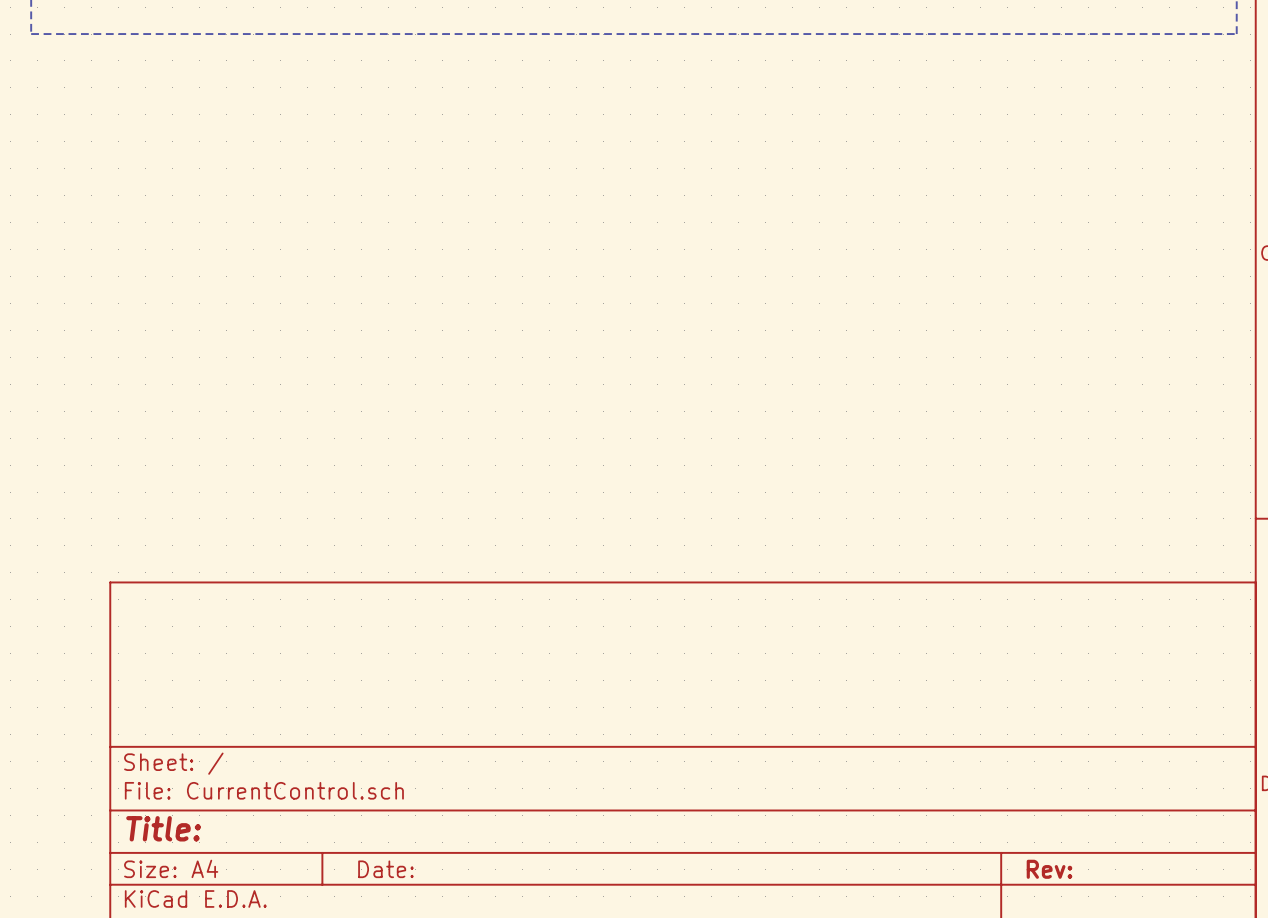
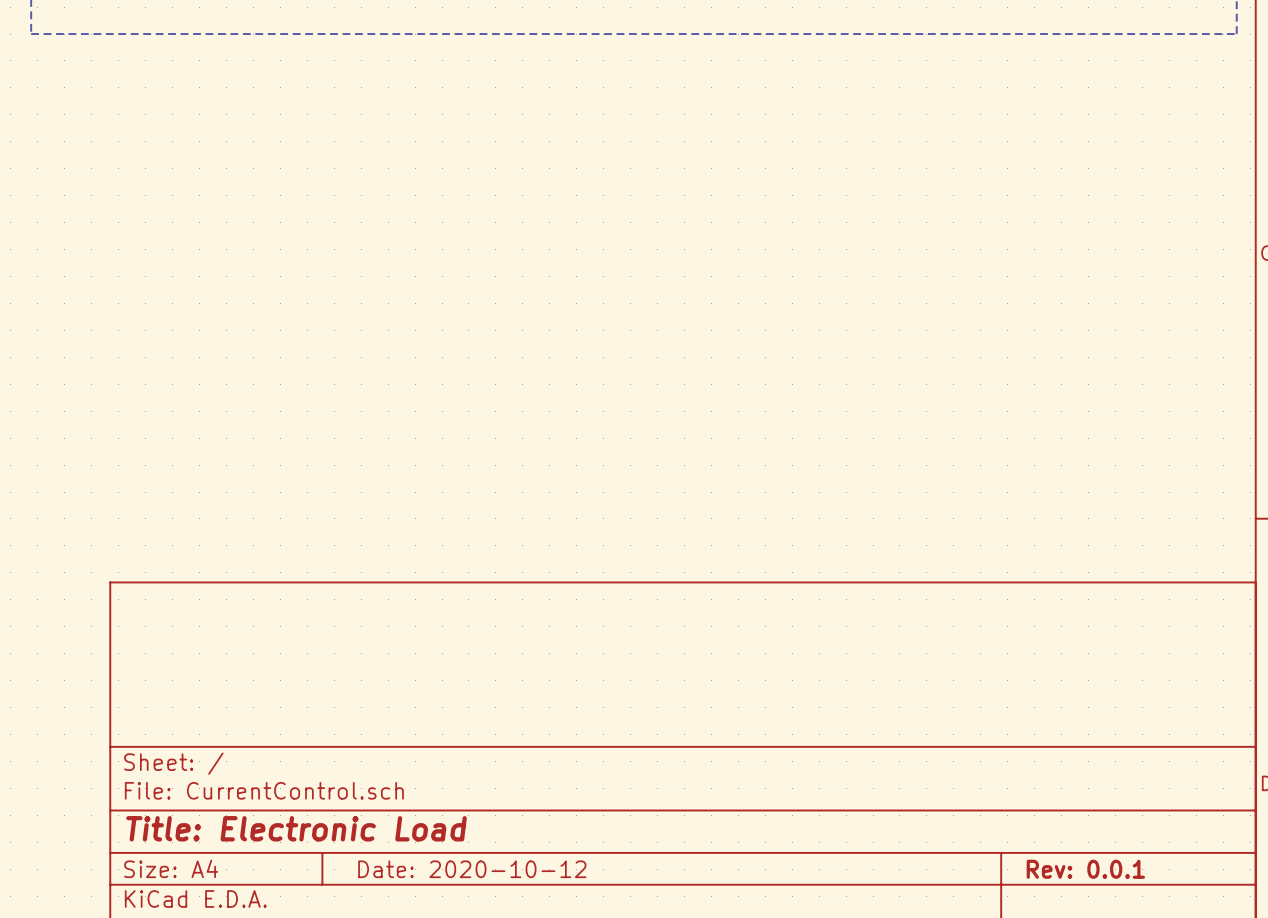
title block: Title: (163, 828) -> Title: Electronic Load (296, 828)
title block: Date: (385, 869) -> Date: 2020-10-12 (472, 869)
title block: Rev: (1049, 869) -> Rev: 0.0.1 (1085, 869)

